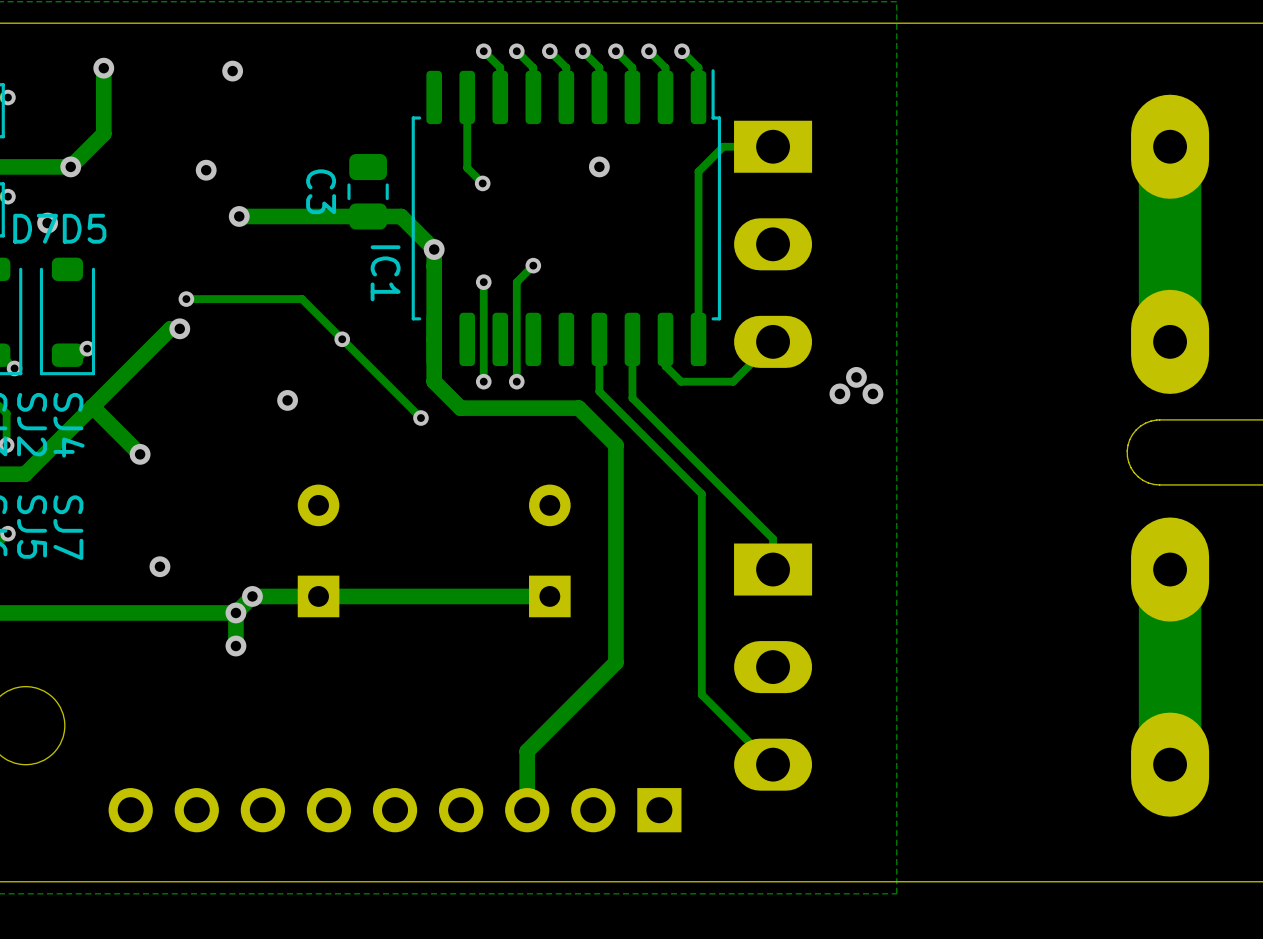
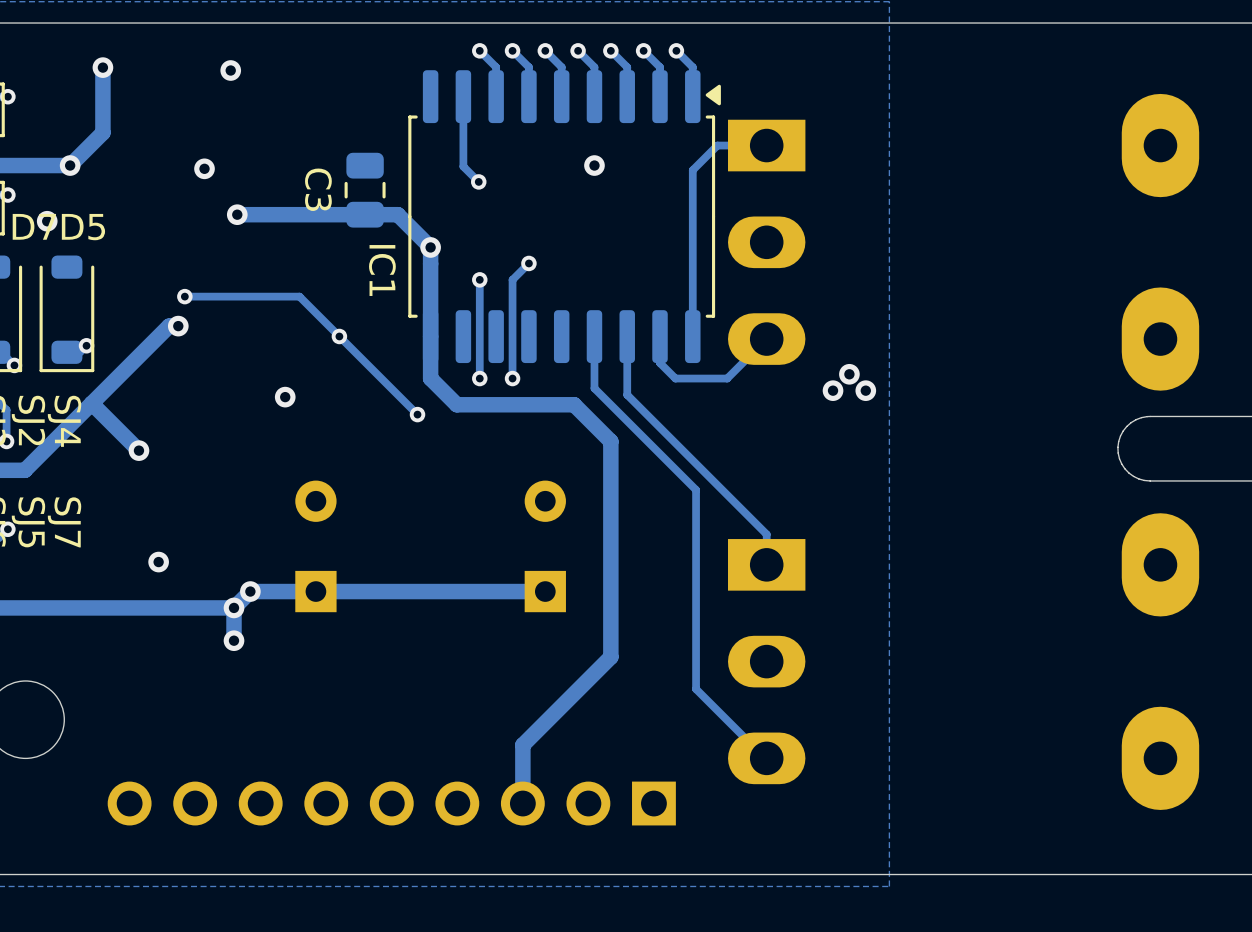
IC1 footprint: [411, 69, 722, 367] -> [408, 70, 721, 364]
track: (1170, 146) (1170, 341) -> none
track: (1170, 569) (1170, 764) -> none

